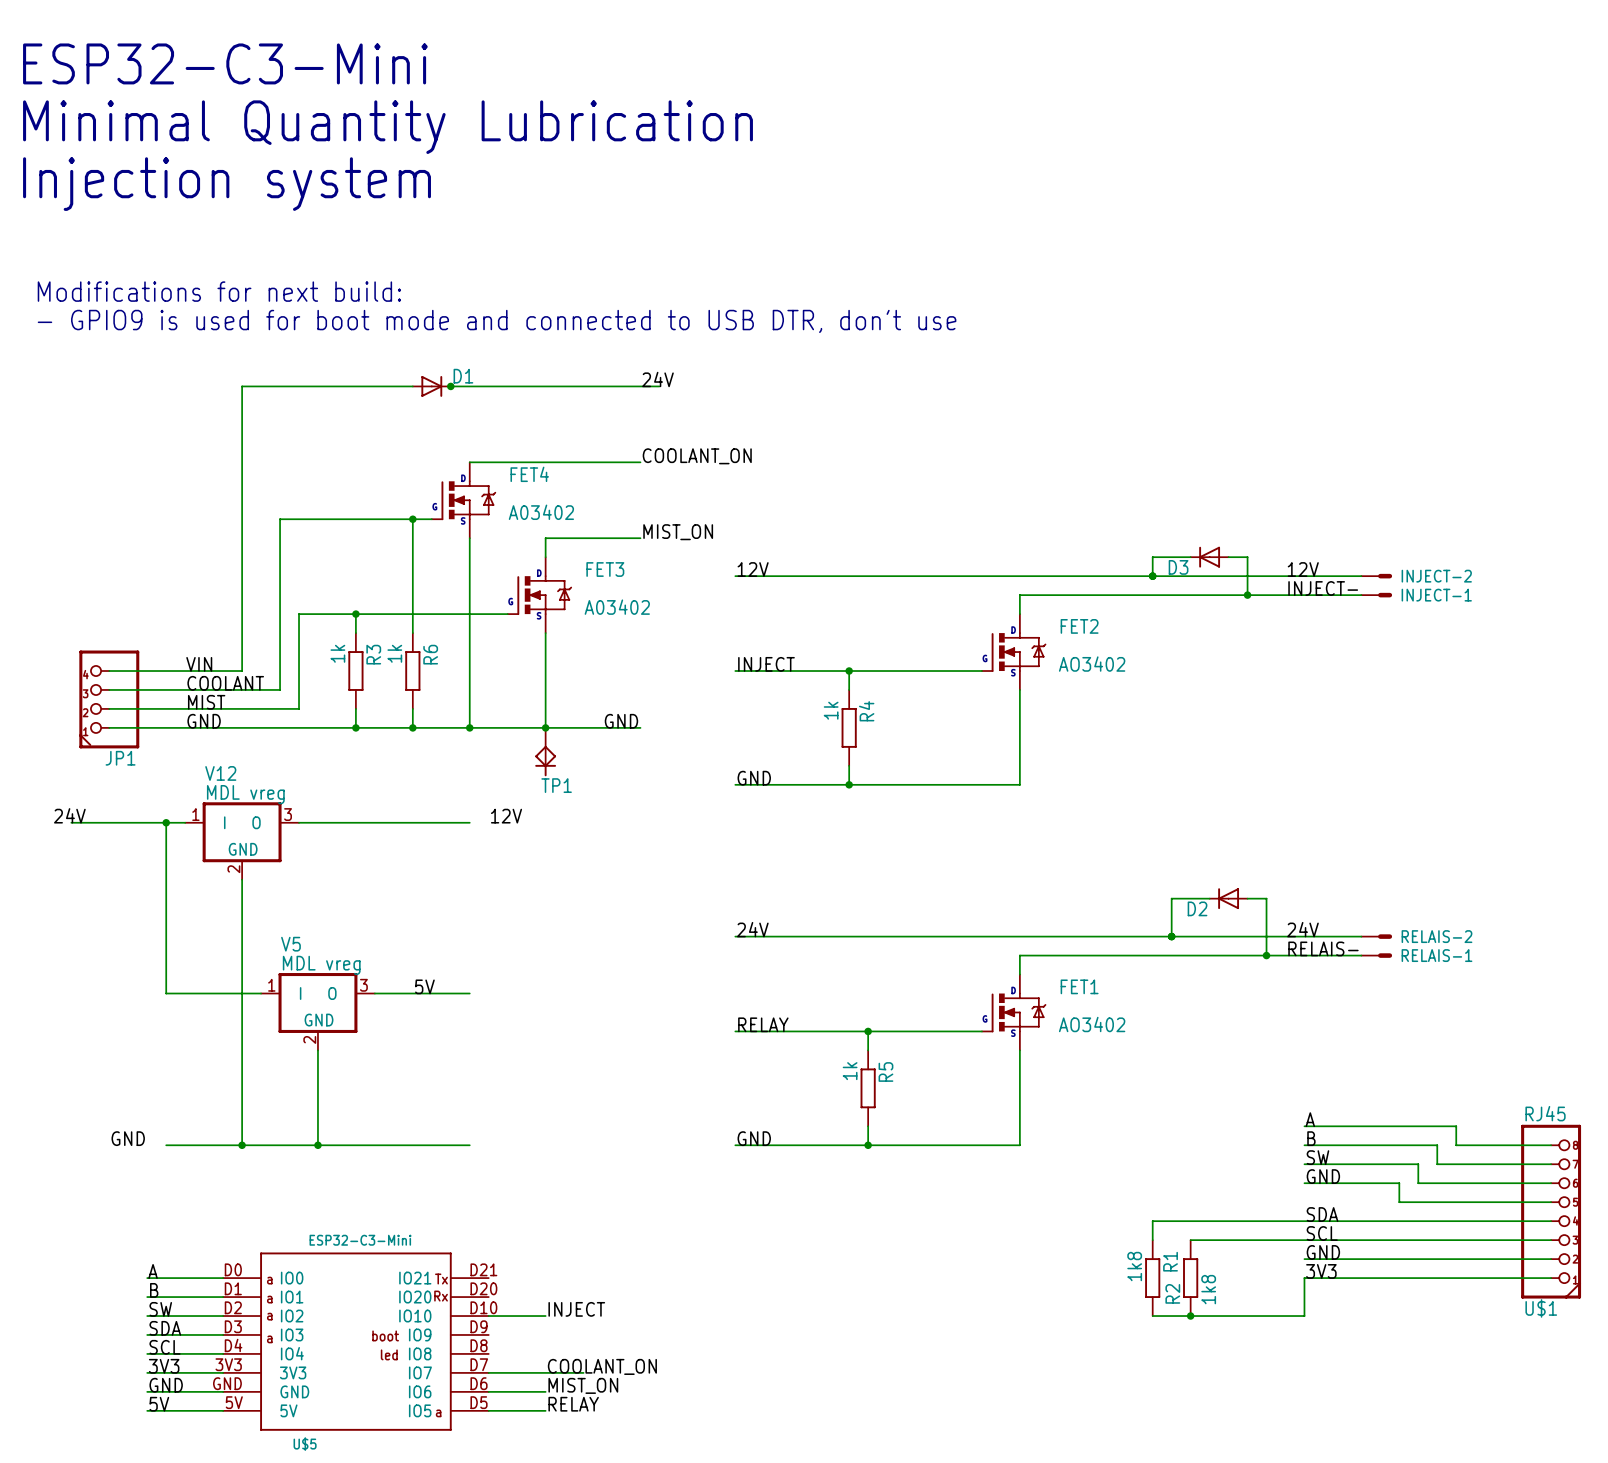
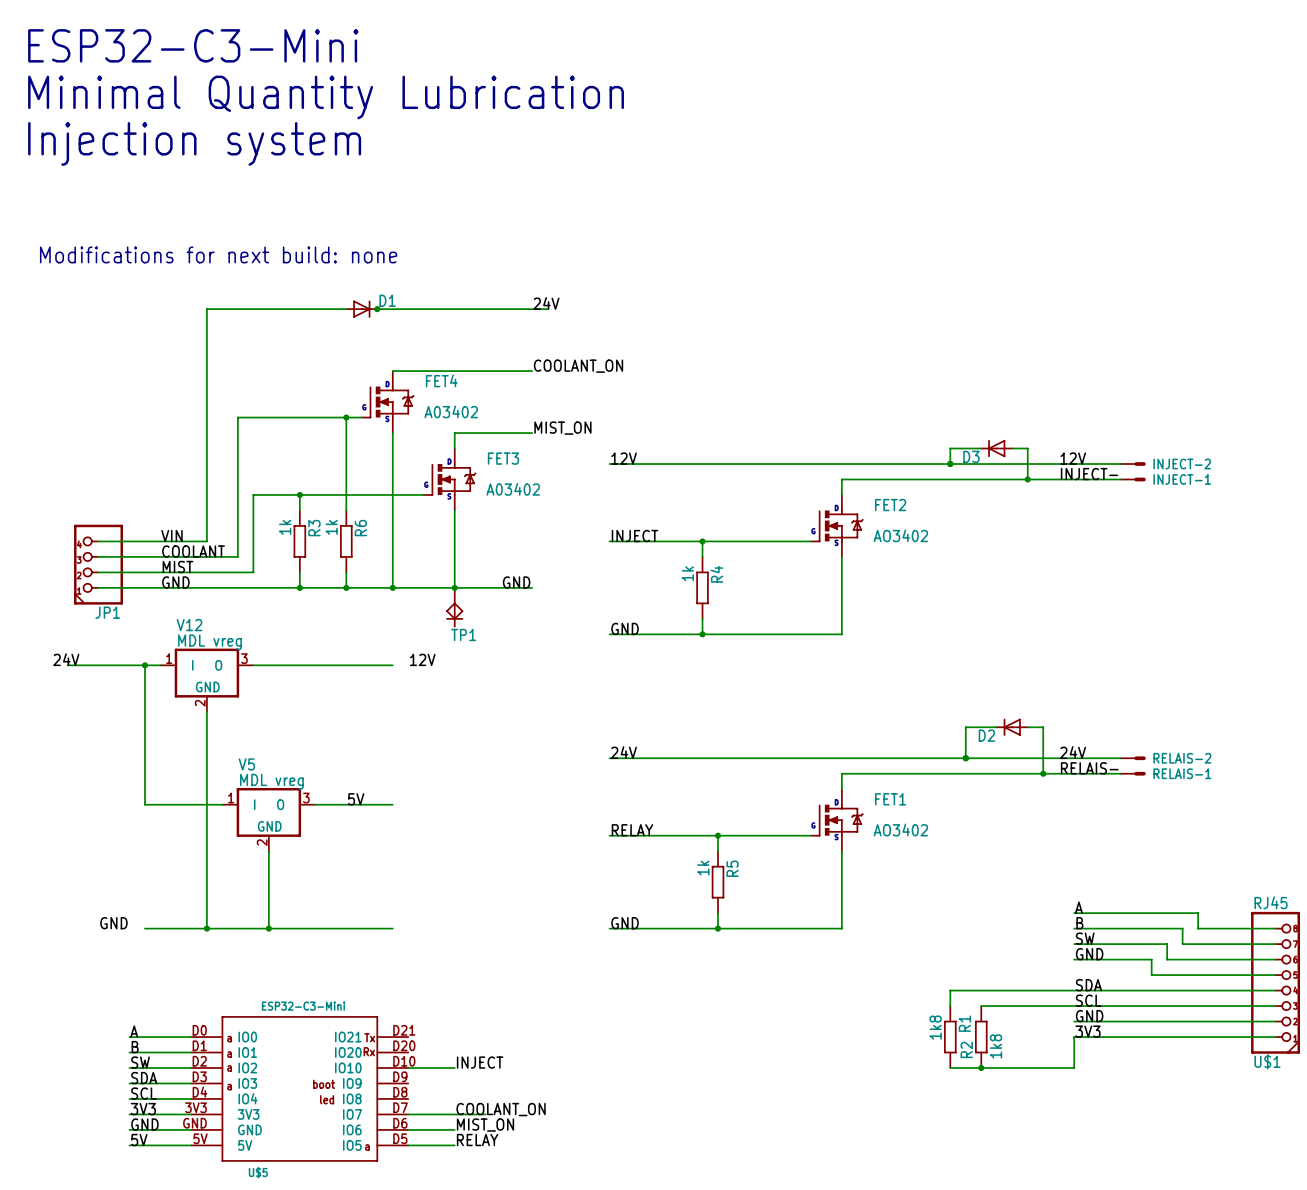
text: Modifications for next build: (219, 291) -> none
text: - GPIO9 is used for boot mode and connected to USB DTR, don't use (497, 321) -> Modifications for next build: none (218, 254)

